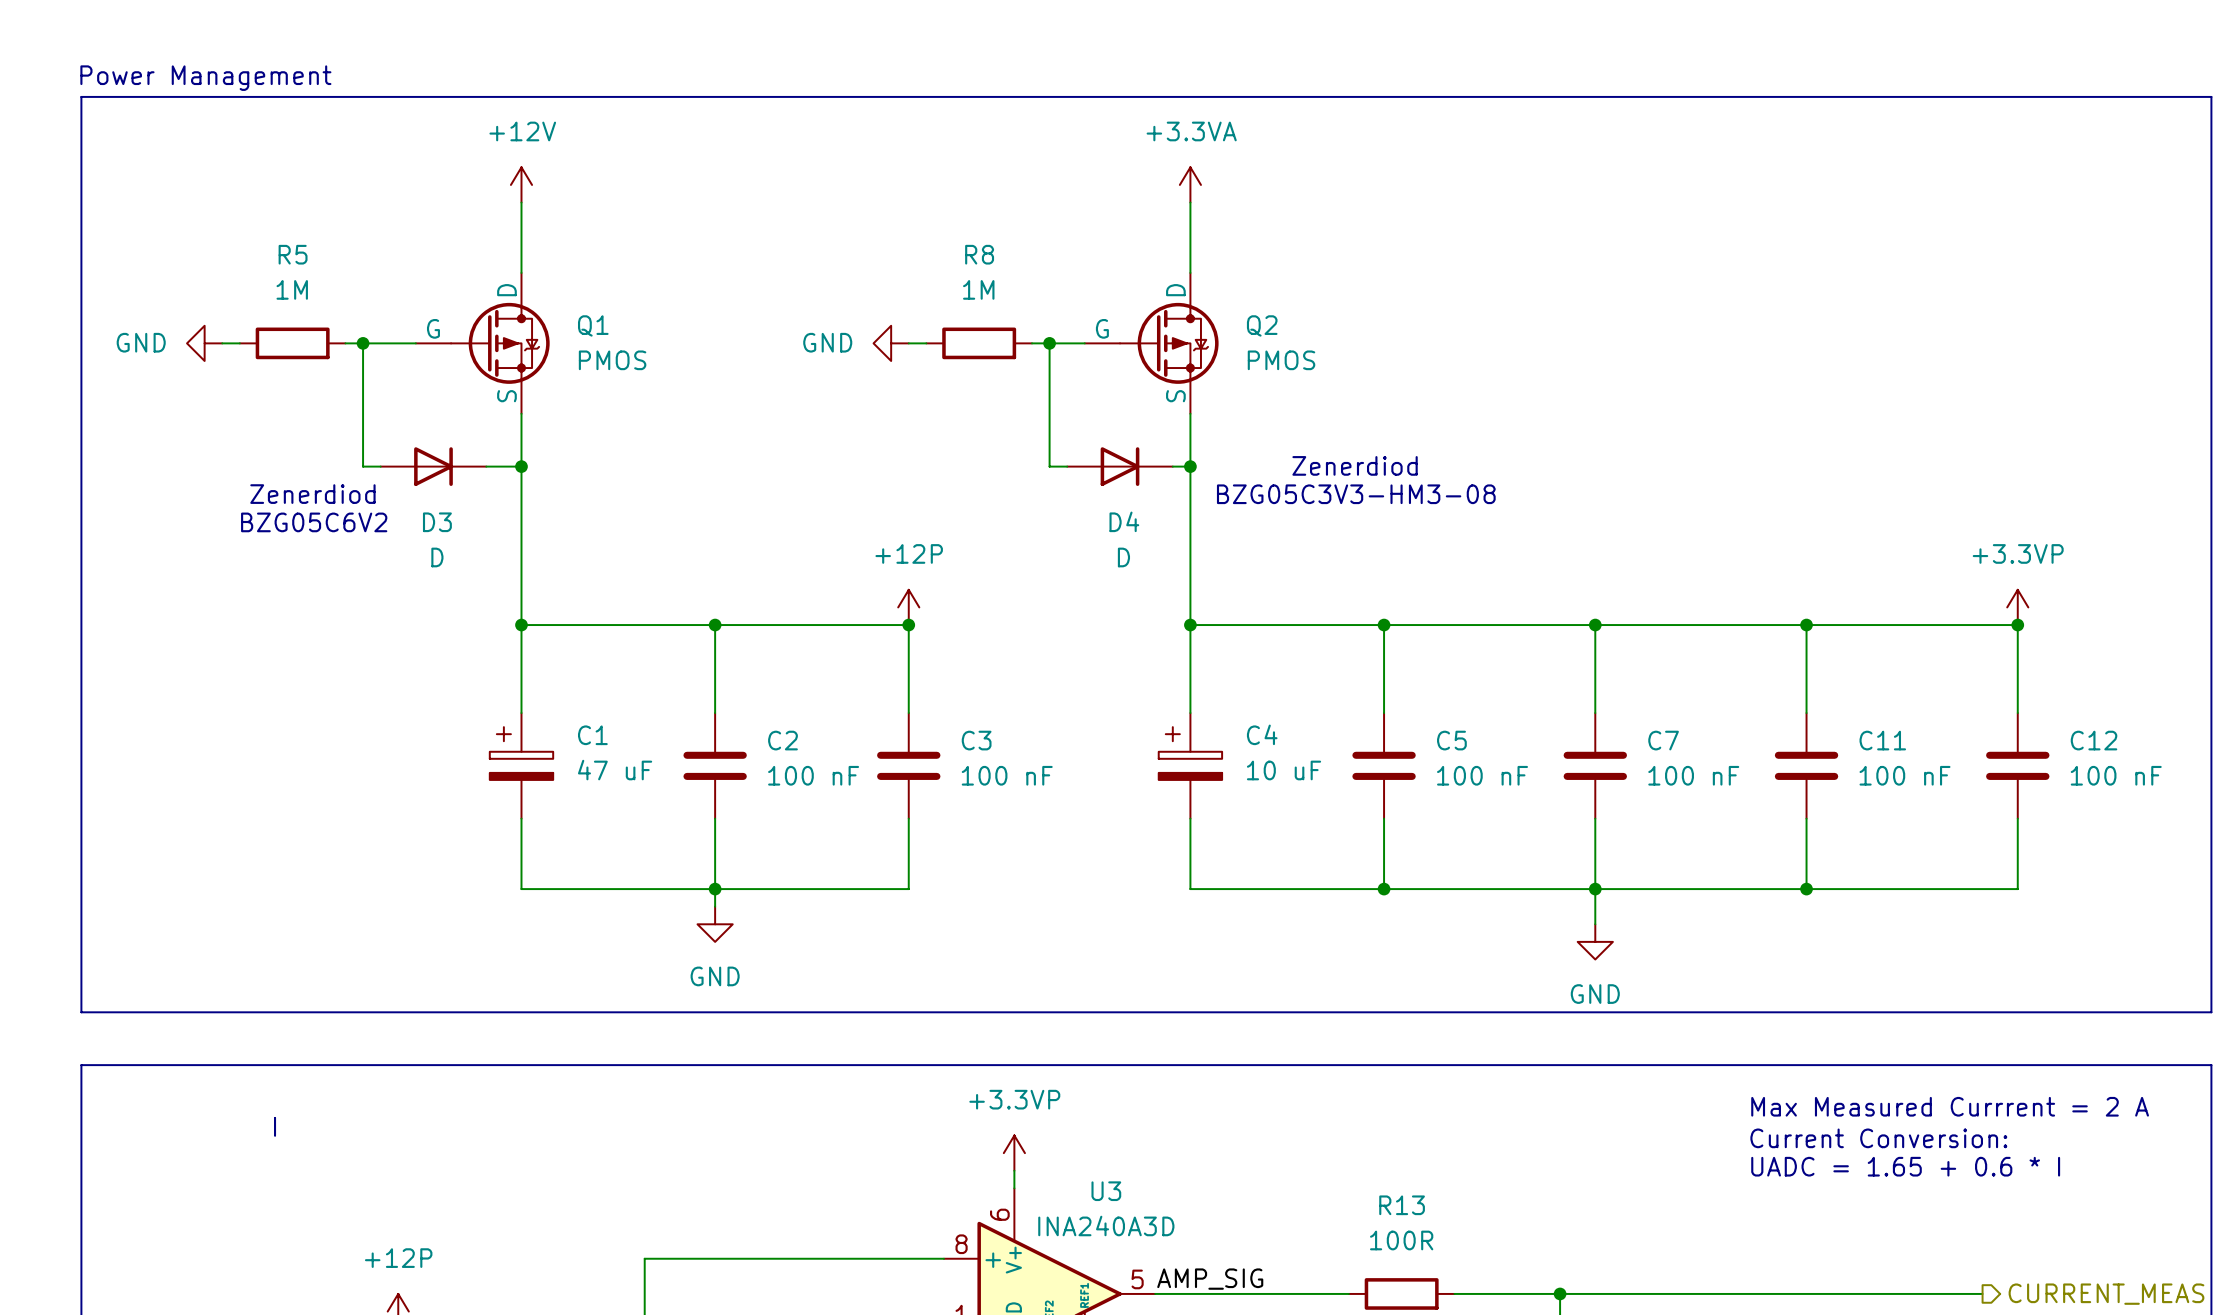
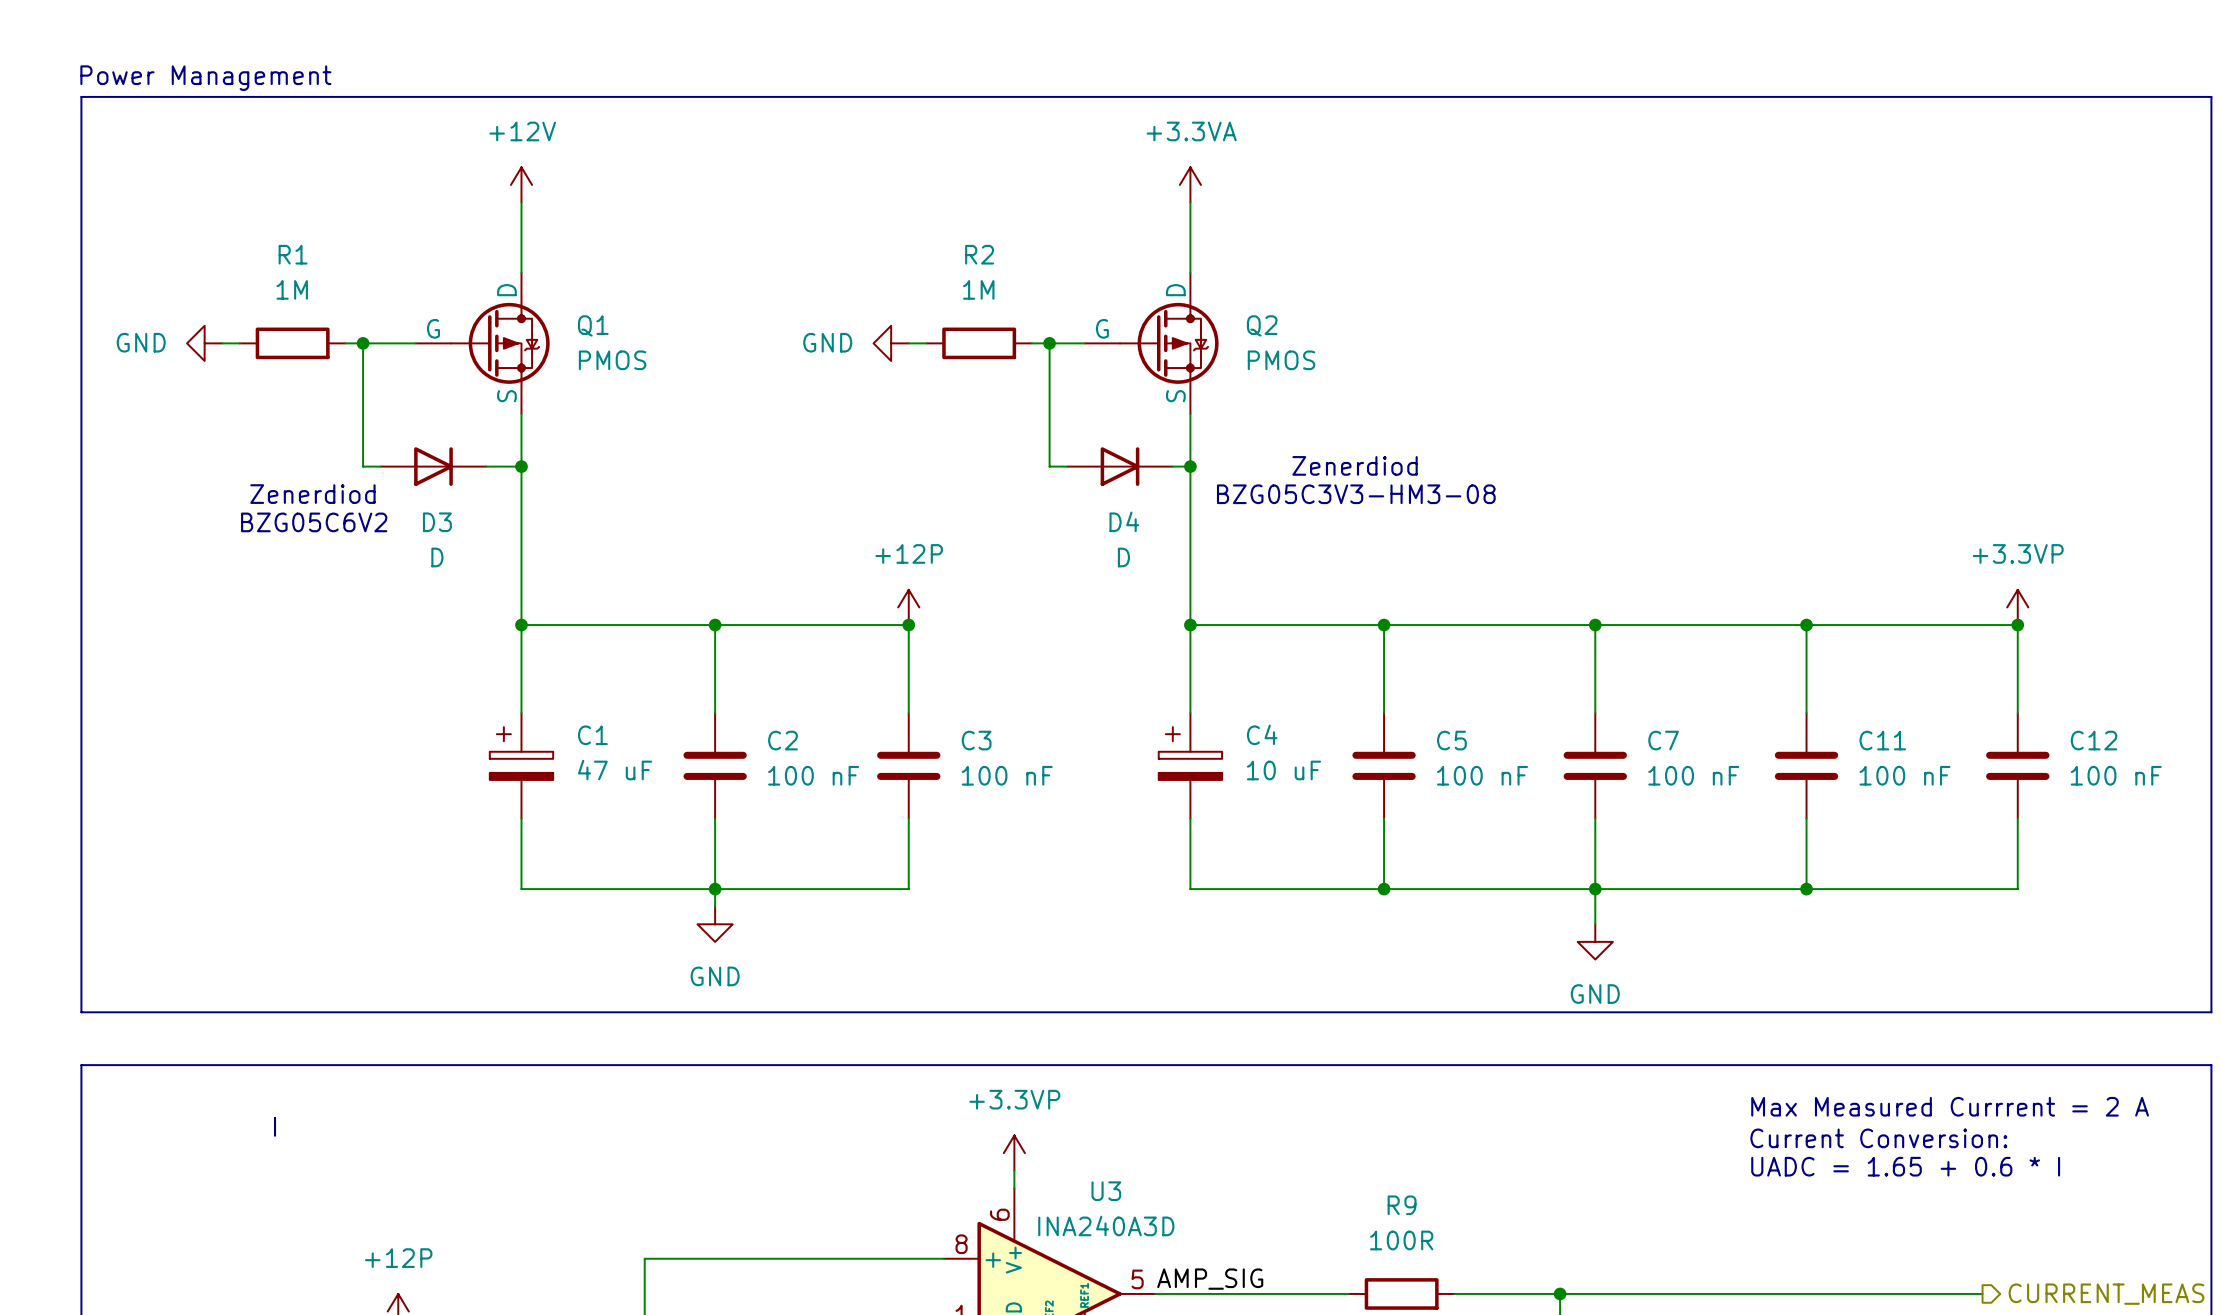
R5 name: R5 (293, 254) -> R1 (293, 254)
R8 name: R8 (979, 254) -> R2 (979, 254)
R13 name: R13 (1402, 1205) -> R9 (1402, 1205)

